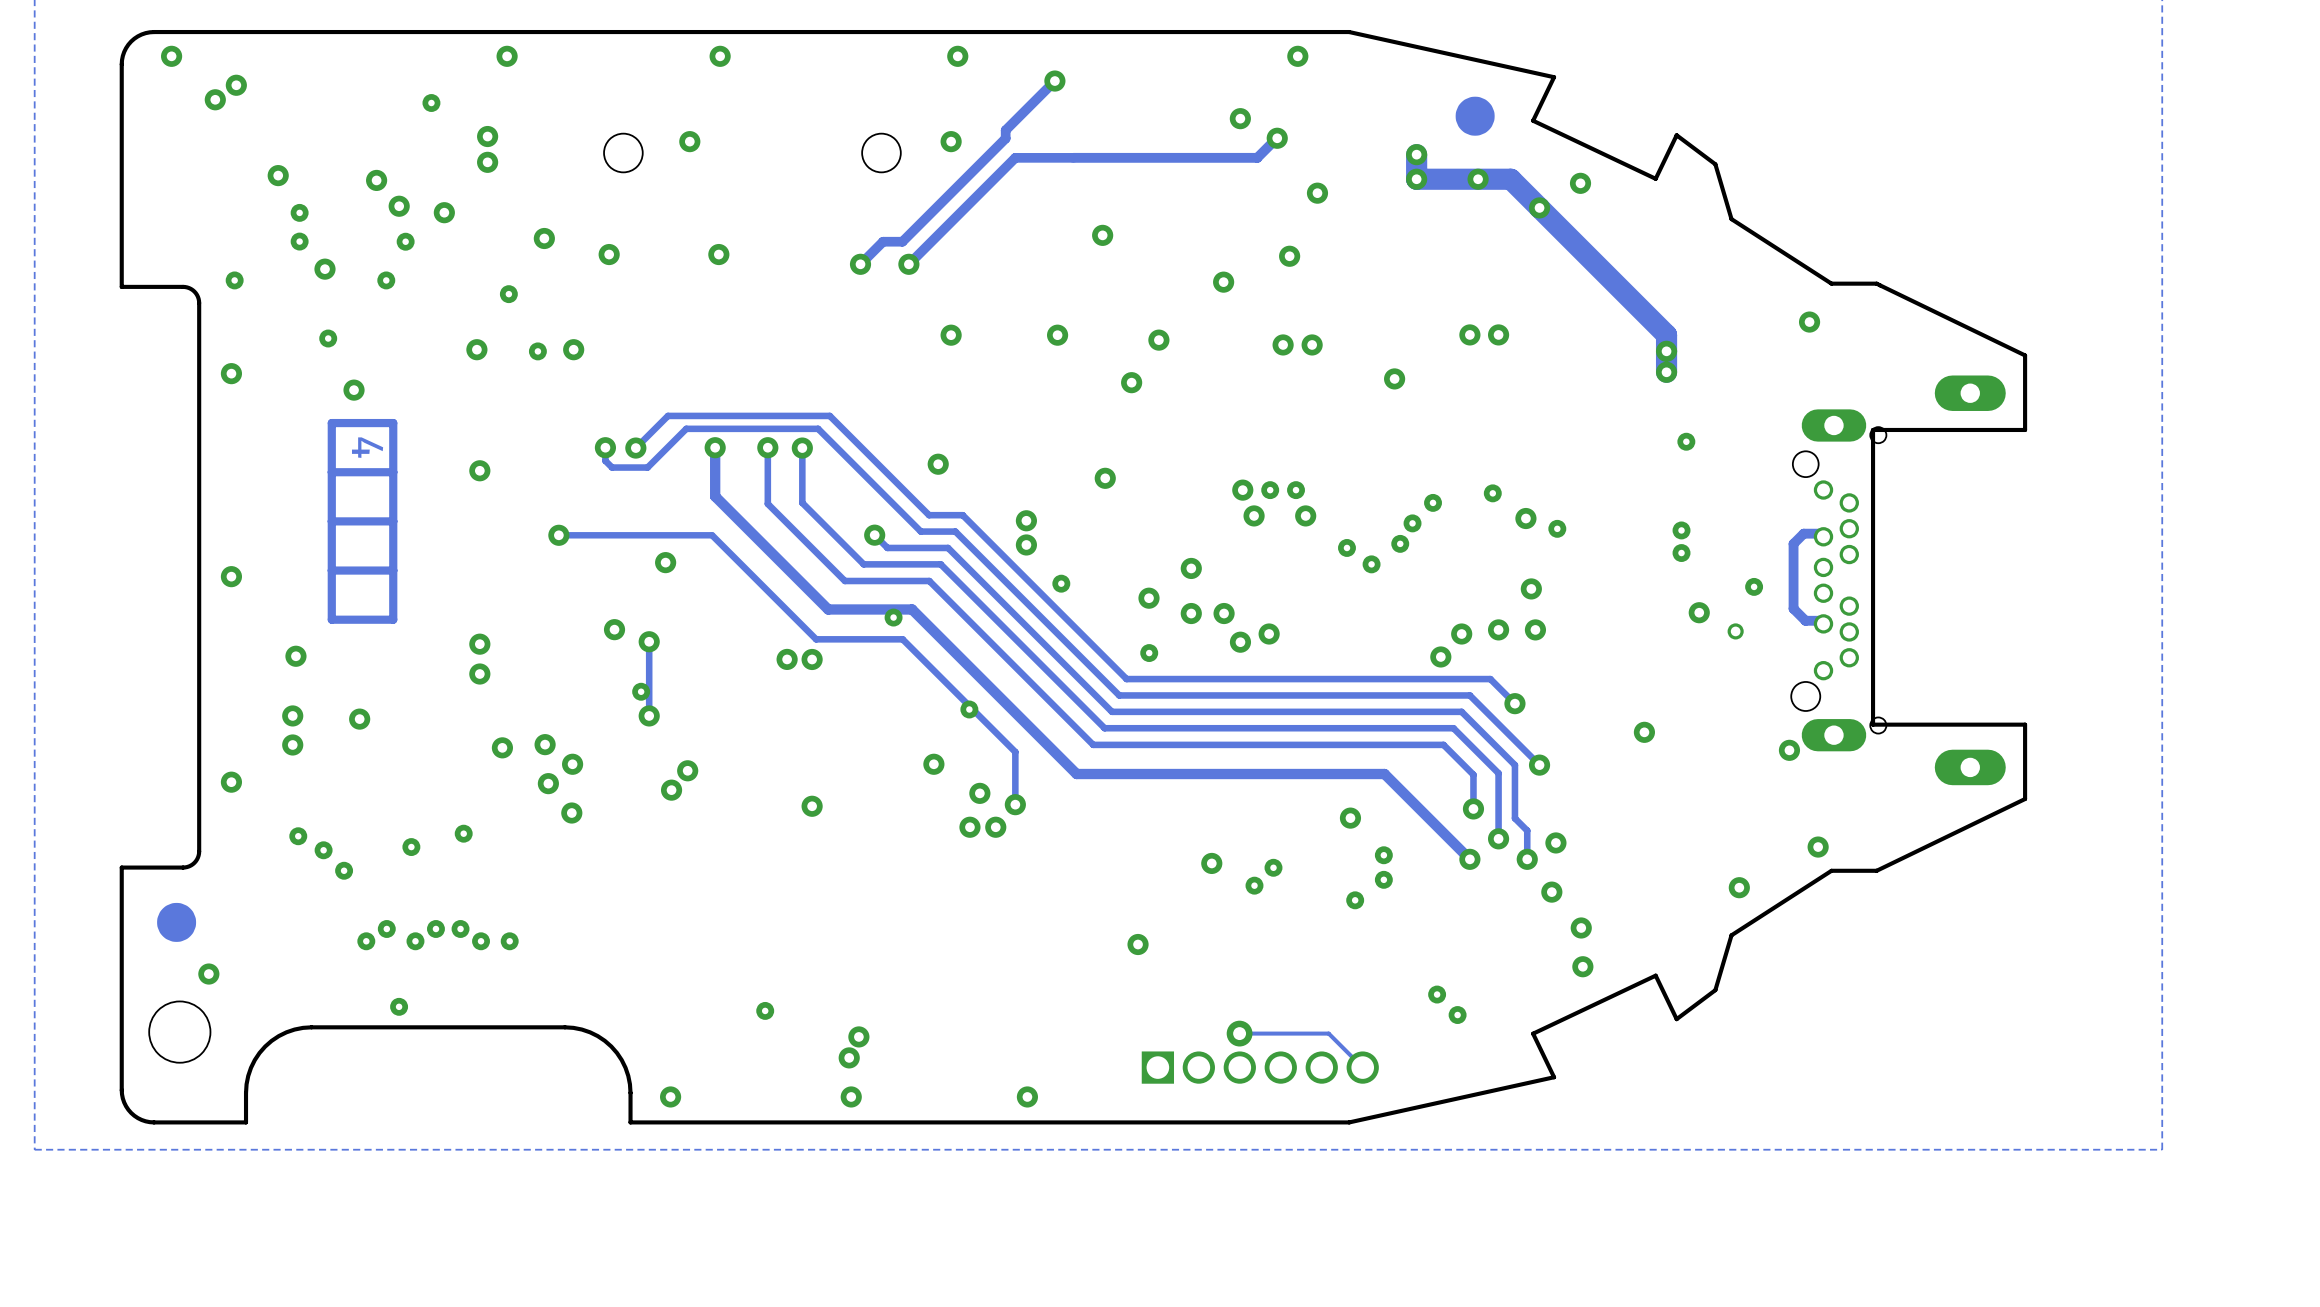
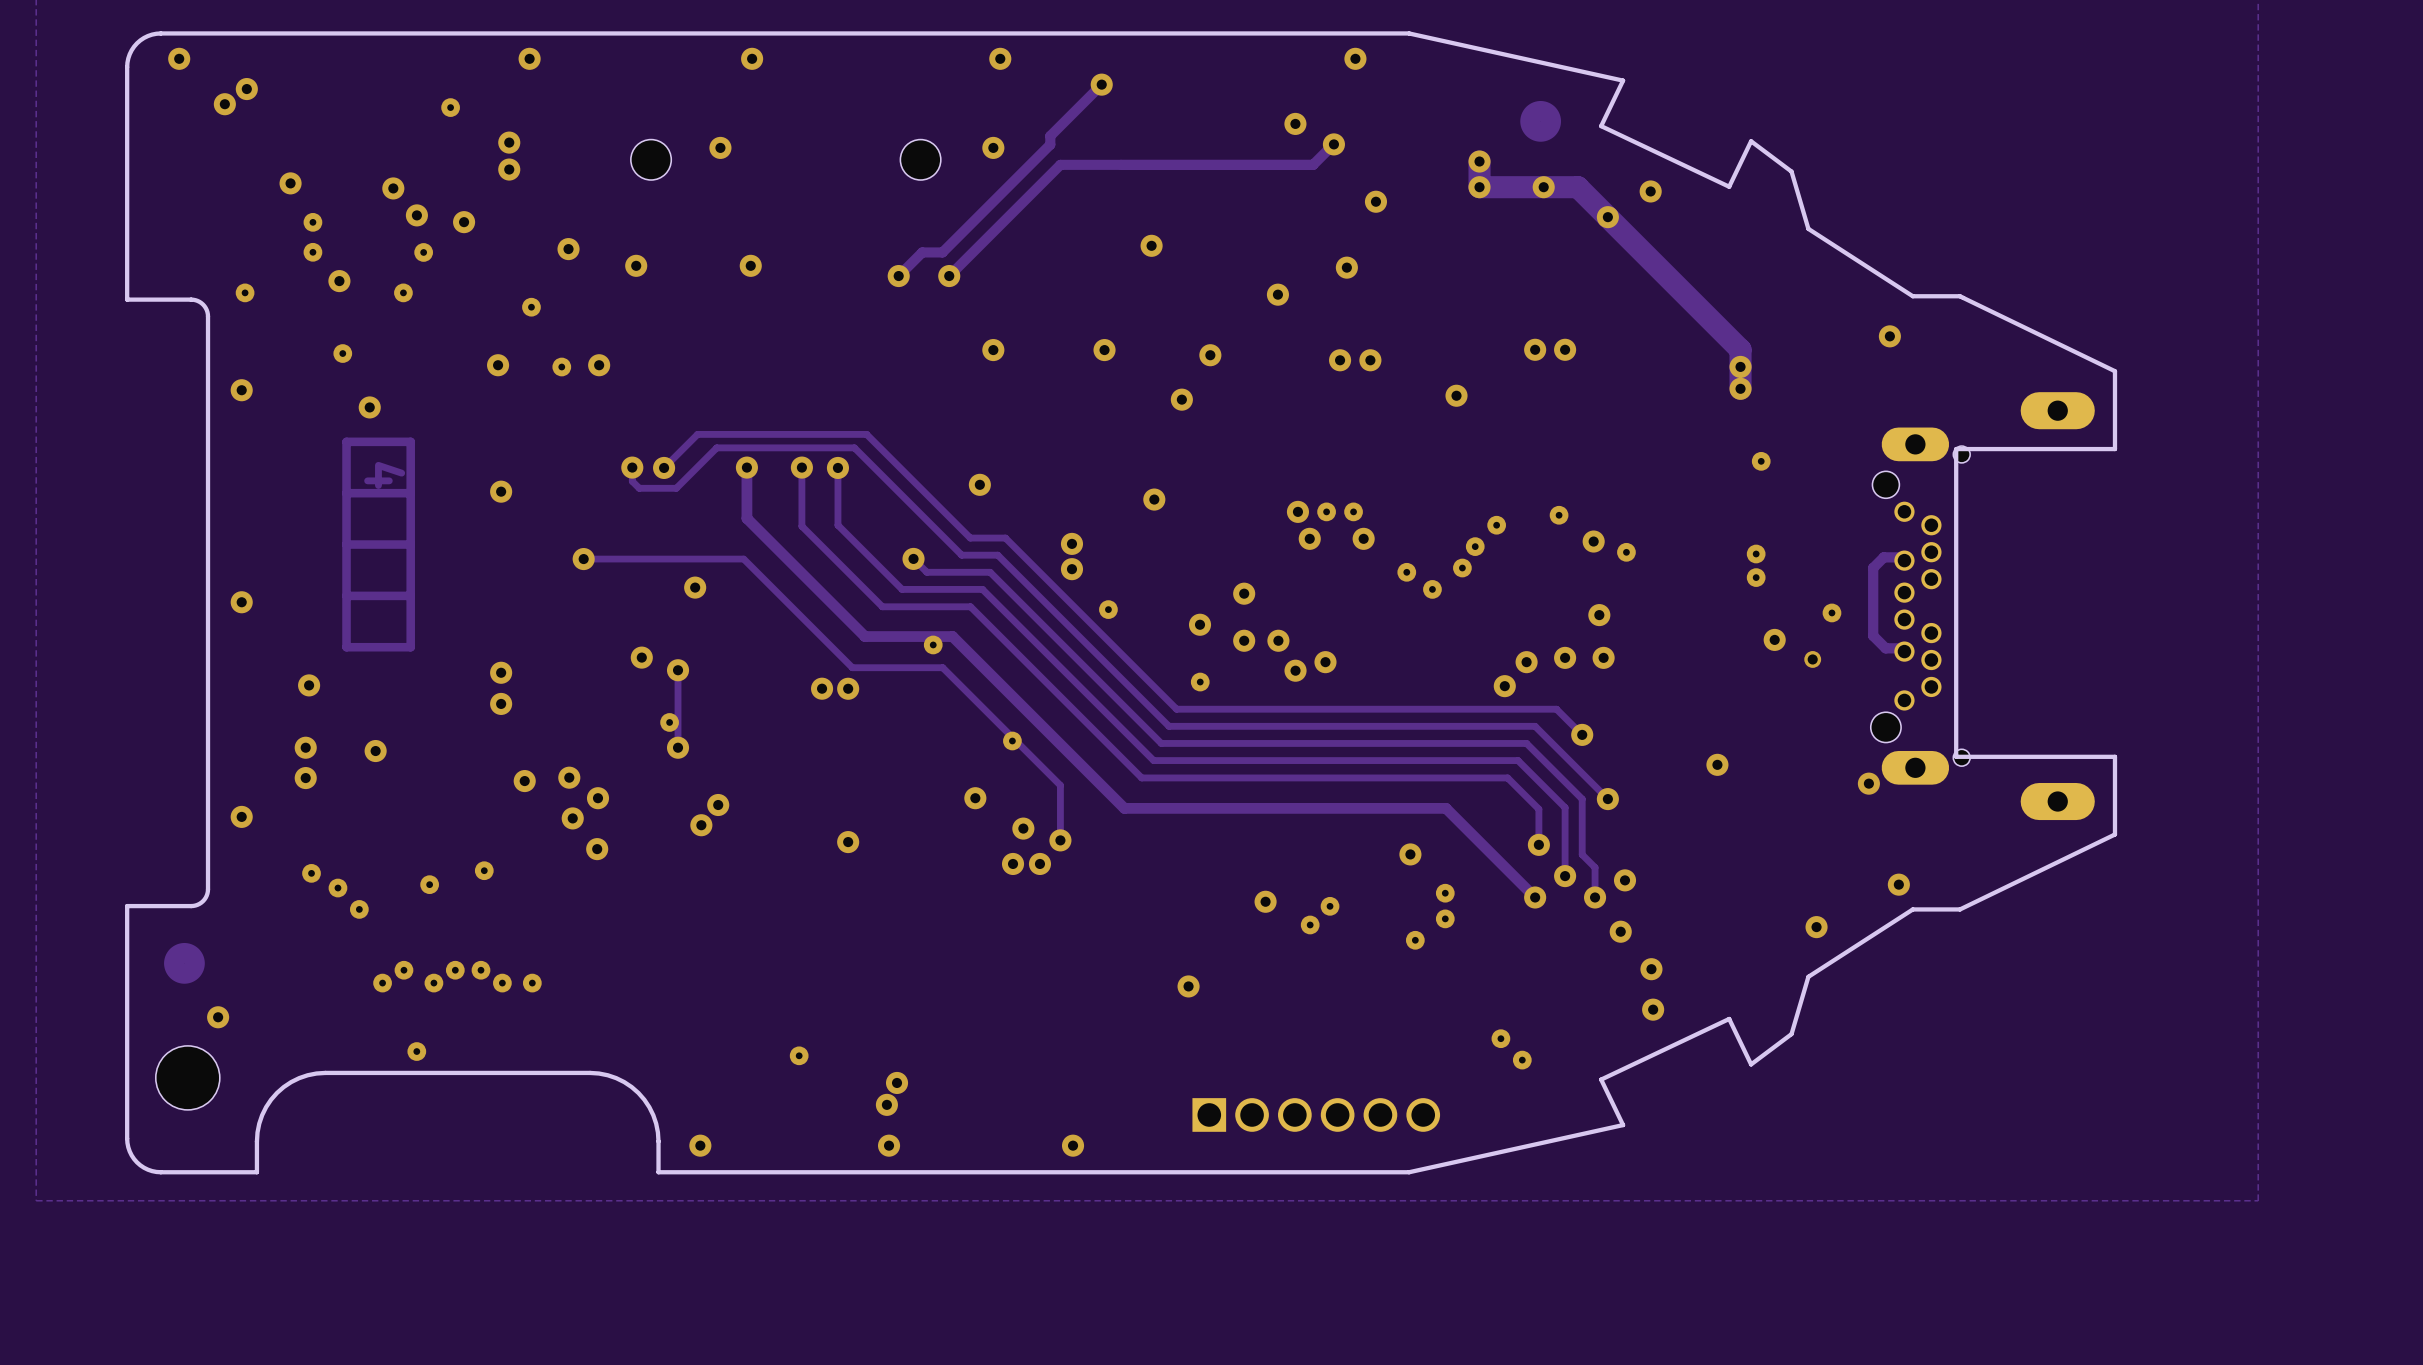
track: (1239, 1033) (1328, 1033) (1362, 1067) -> none
via: (1239, 1033) -> none

